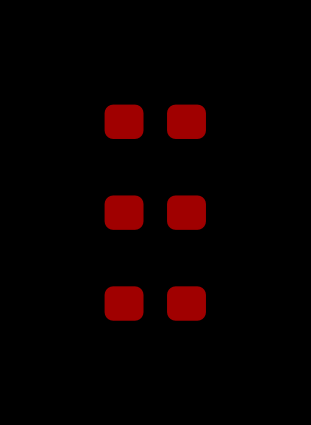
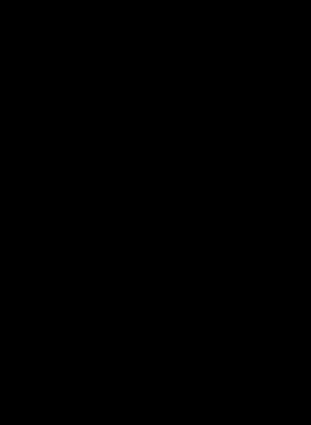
part: (155, 121) -> none
part: (155, 212) -> none
part: (155, 303) -> none

